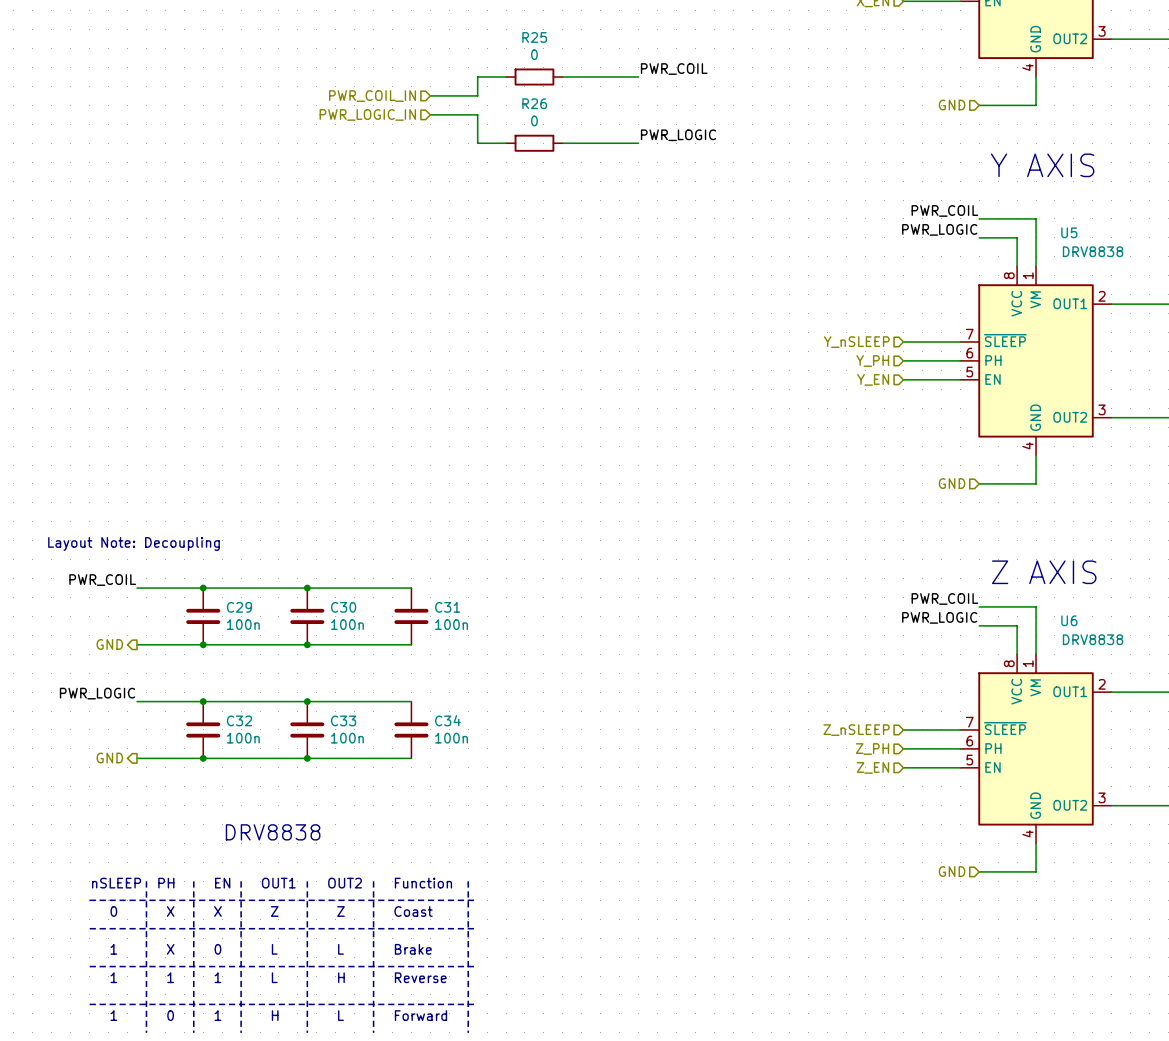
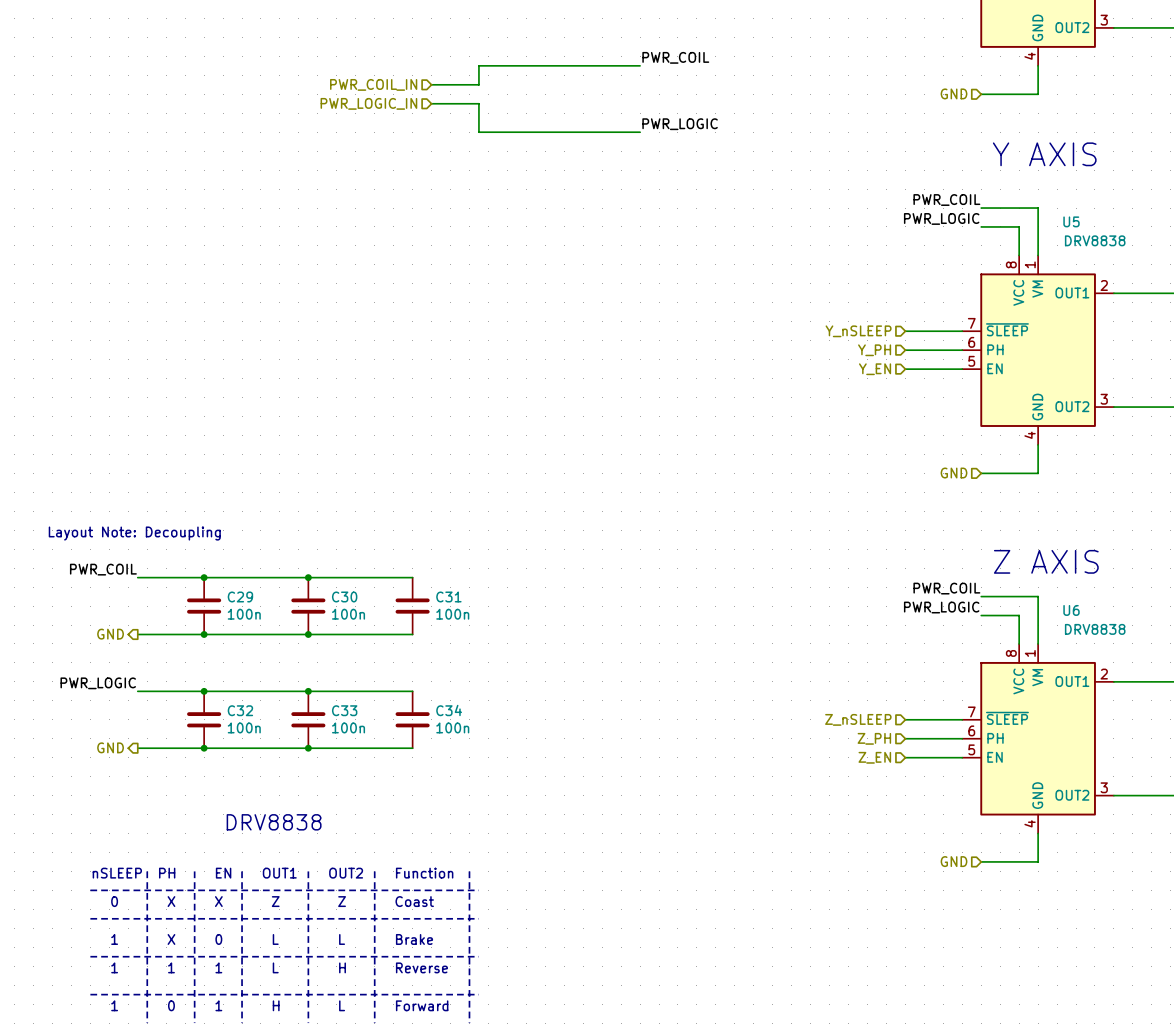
wire: none -> (507, 65) (564, 65)
R25: 0 (534, 77) -> none
wire: none -> (507, 132) (564, 132)
R26: 0 (534, 143) -> none

